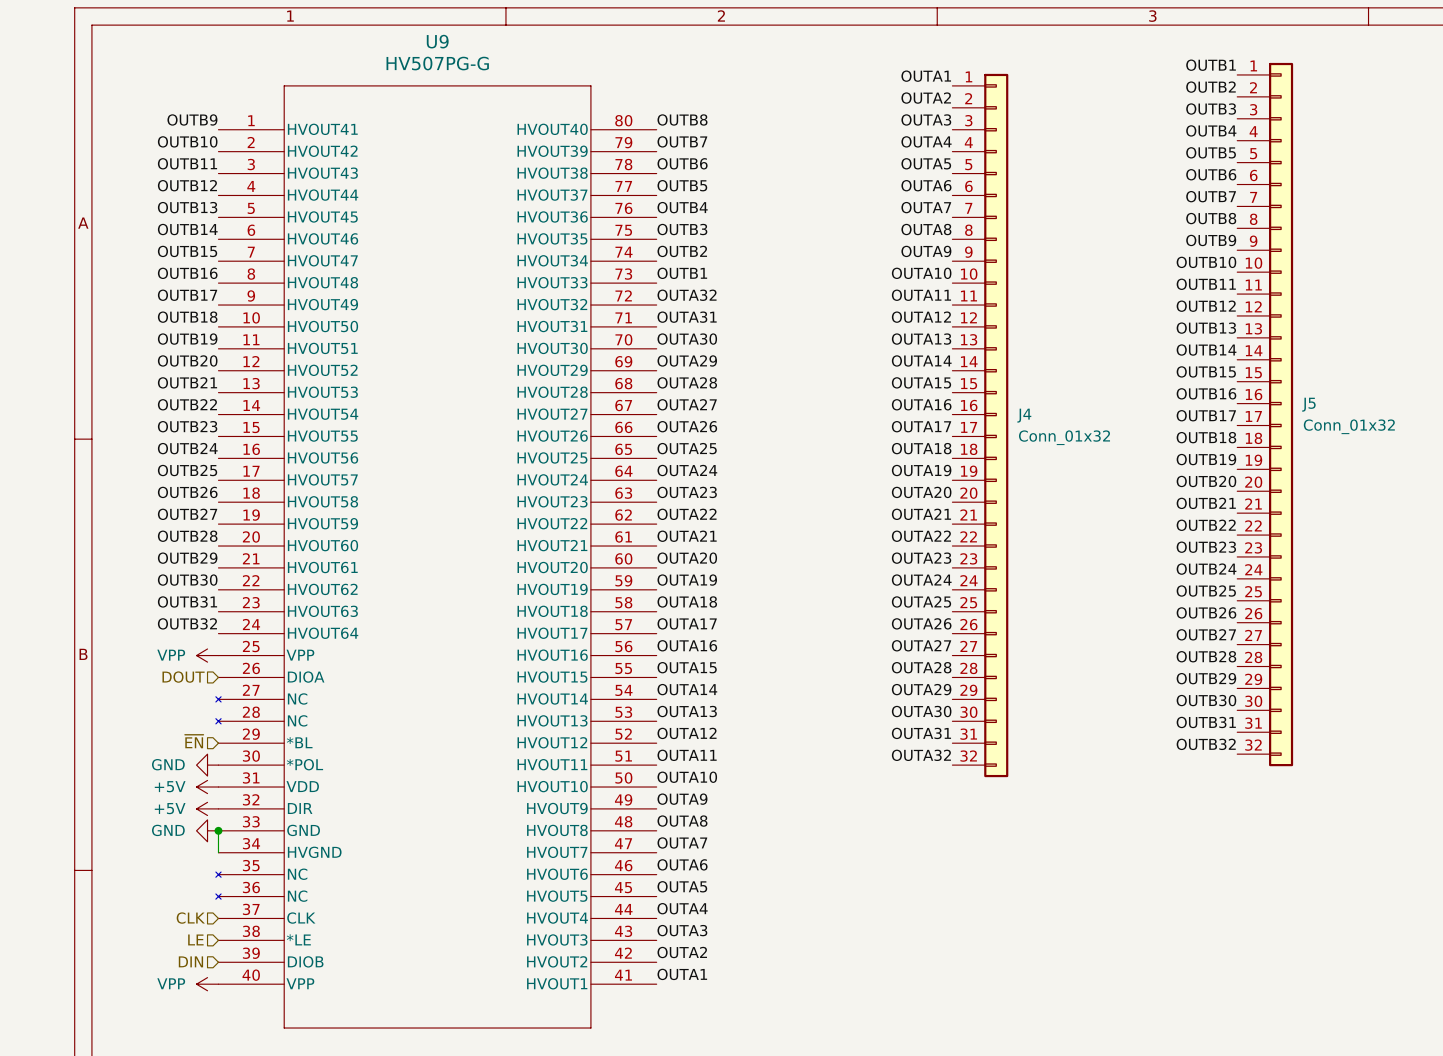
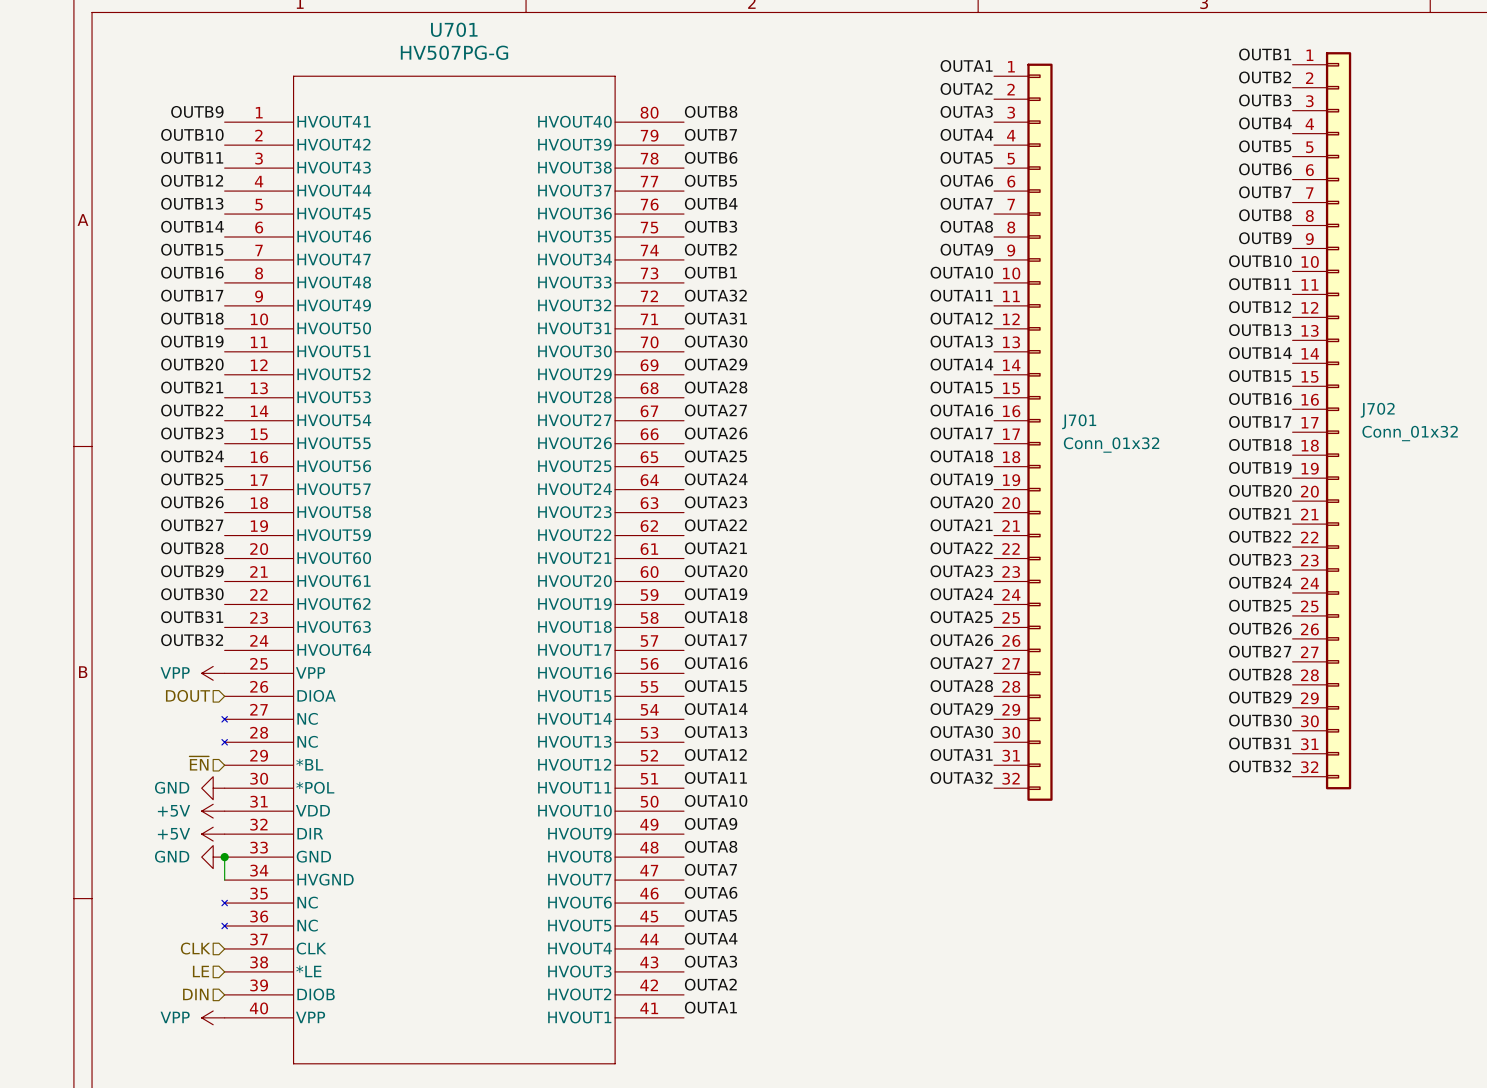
U9 name: U9 (437, 41) -> U701 (454, 29)
J5 name: J5 (1308, 404) -> J702 (1377, 410)
J4 name: J4 (1024, 415) -> J701 (1079, 421)

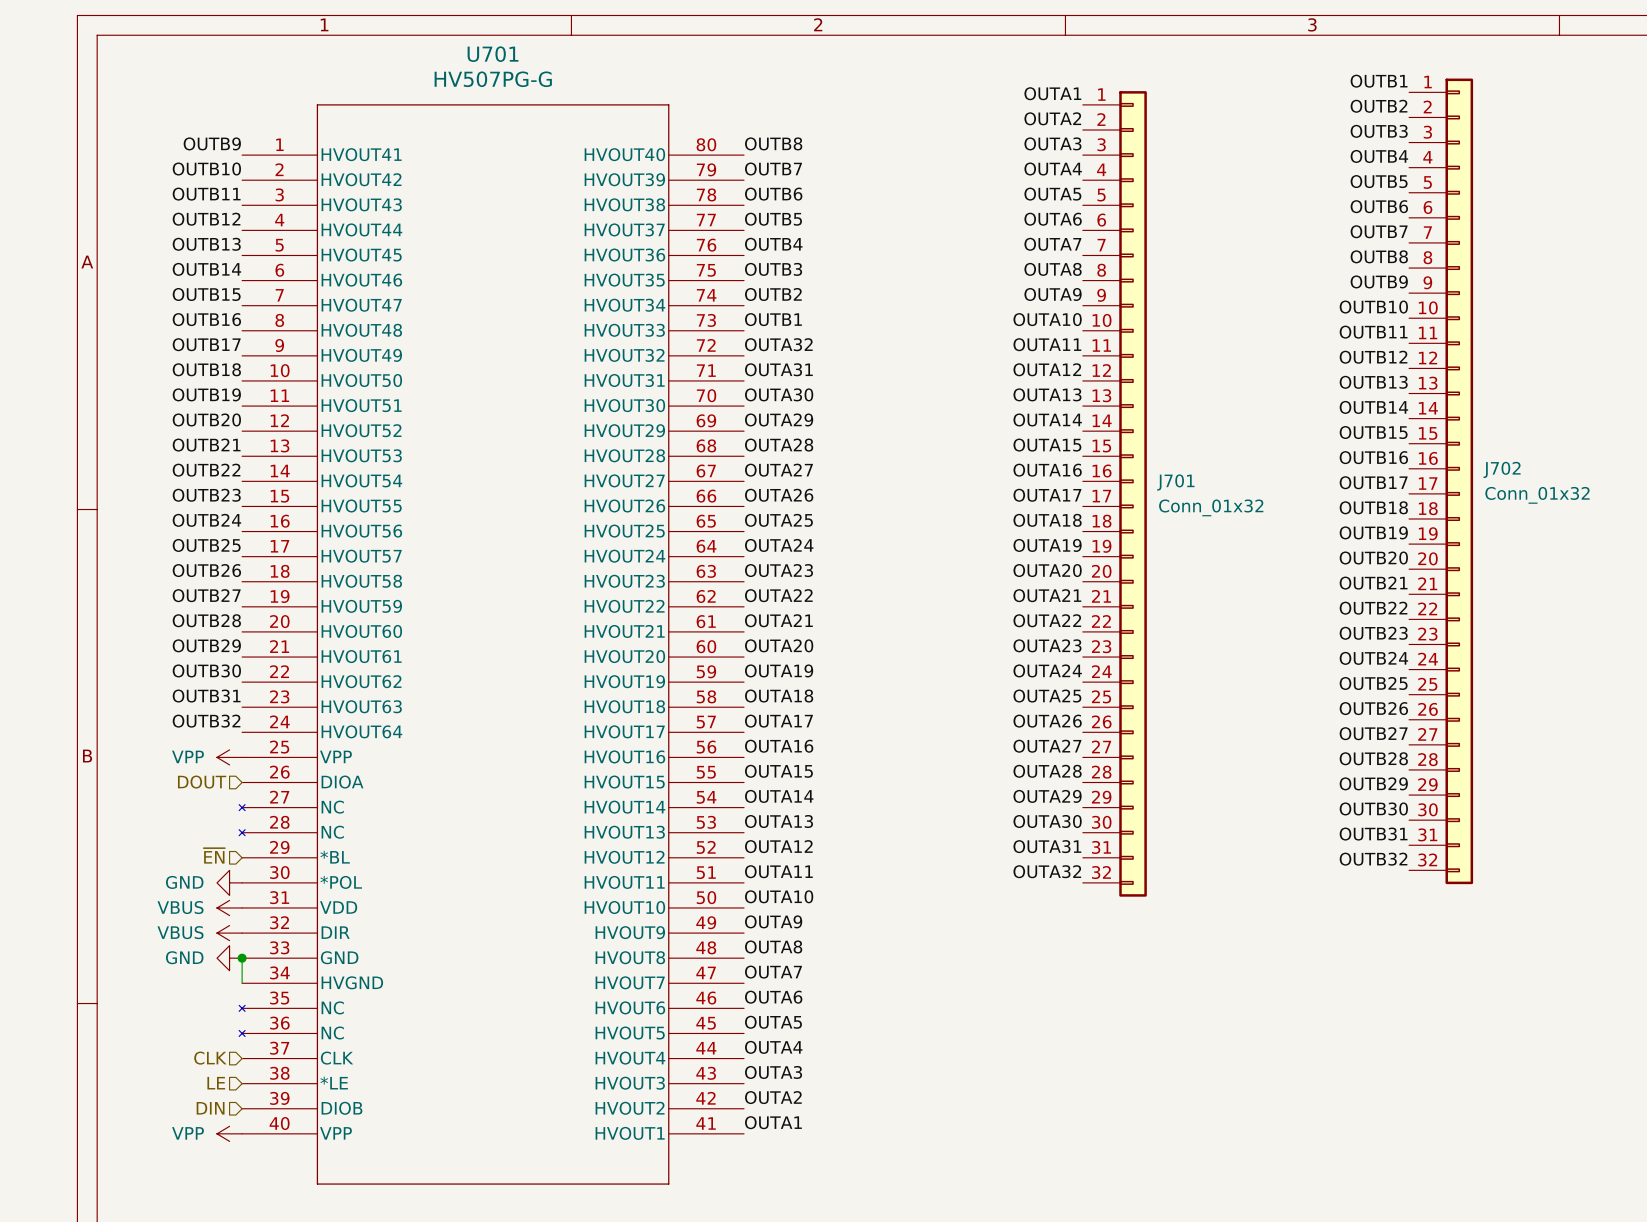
power symbol: +5V (213, 811) -> VBUS (229, 907)
power symbol: +5V (213, 834) -> VBUS (229, 933)

